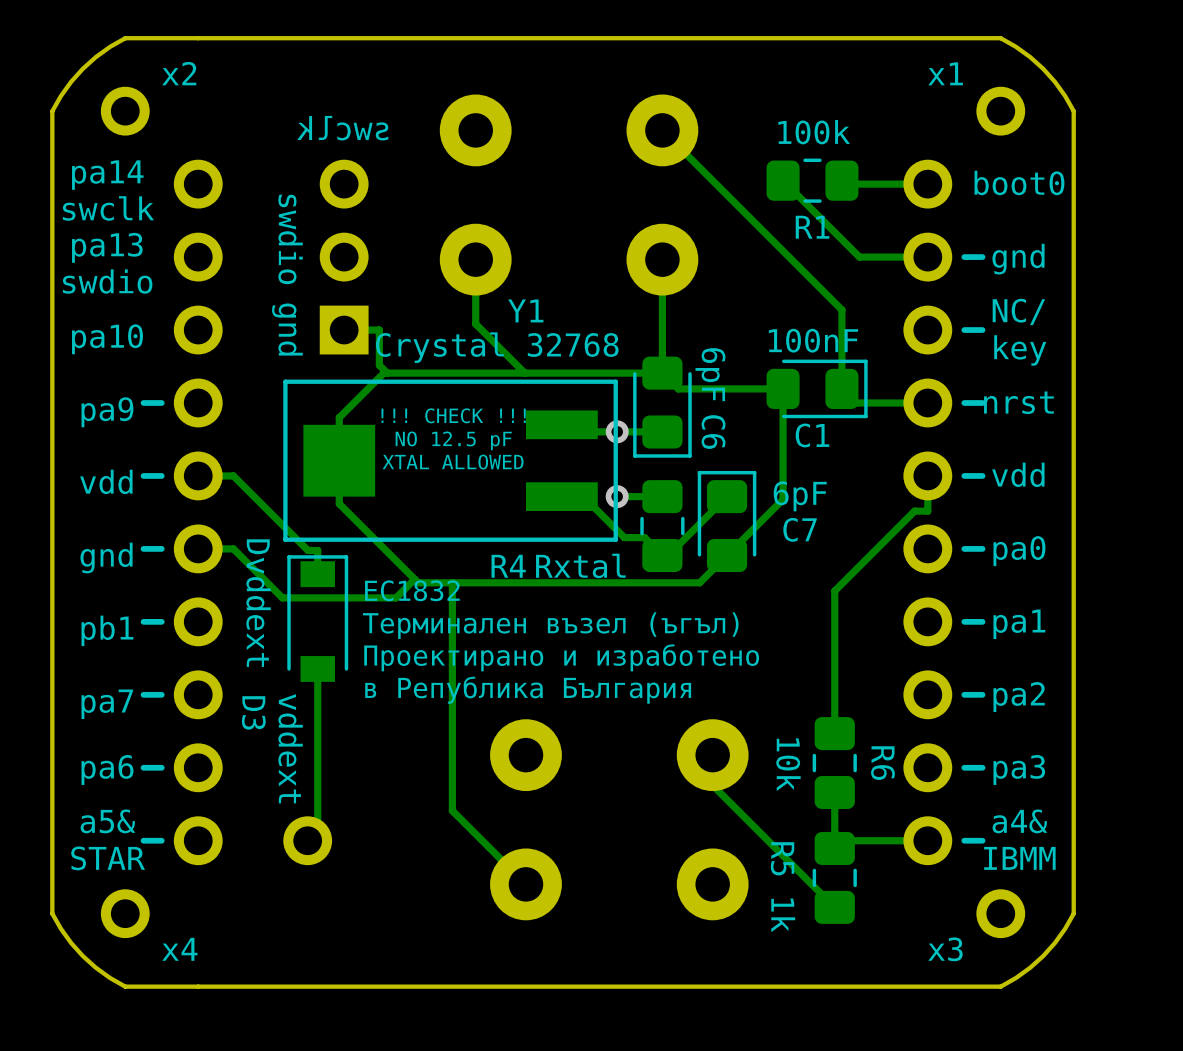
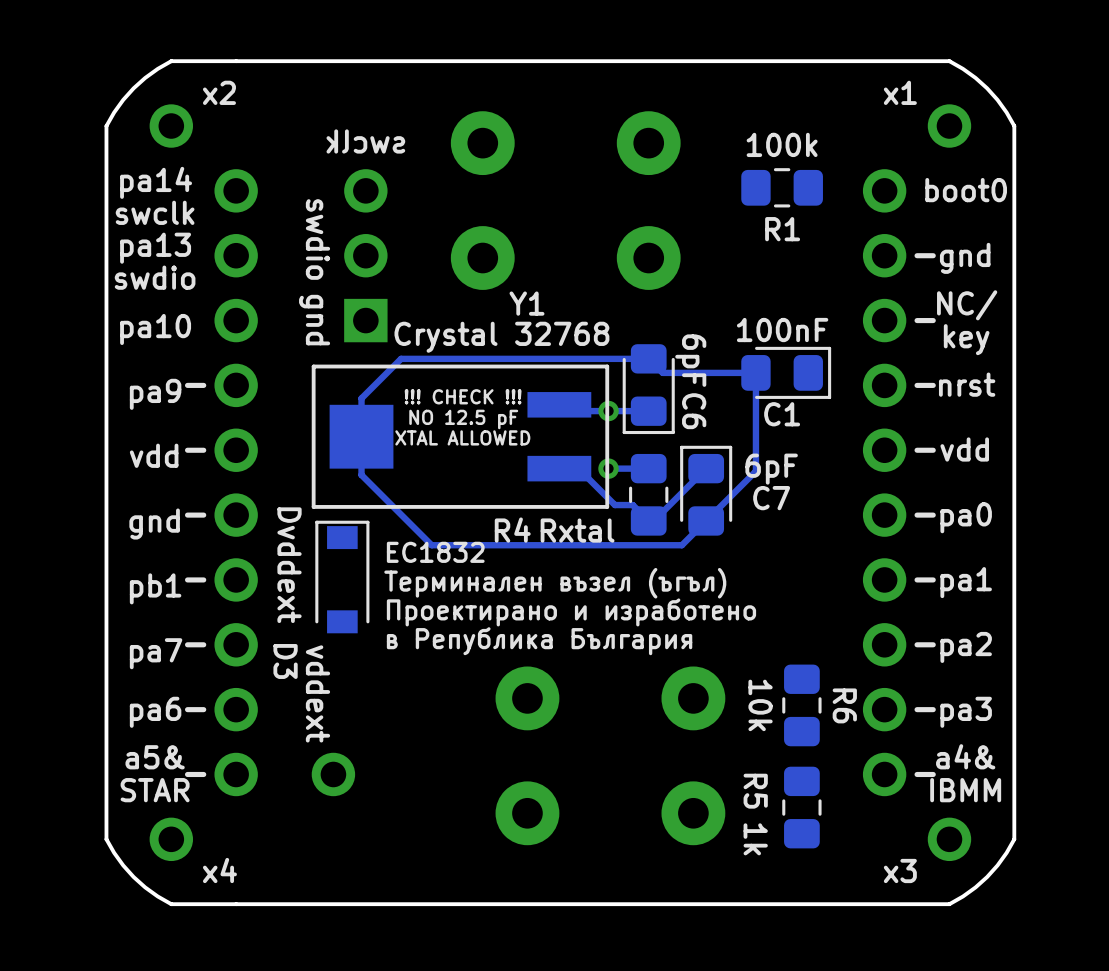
track: (662, 130) (841, 309) (841, 388) (856, 402) (927, 402) -> none
track: (783, 180) (859, 257) (927, 257) -> none
track: (841, 180) (845, 184) (927, 184) -> none
track: (475, 259) (475, 324) (524, 373) -> none
track: (662, 259) (662, 373) -> none
track: (344, 330) (379, 330) (379, 365) (387, 373) -> none
track: (198, 475) (233, 475) (307, 550) (317, 550) (317, 574) -> none
track: (927, 475) (927, 511) (914, 511) (834, 591) (834, 733) -> none
track: (198, 548) (233, 548) (282, 597) (396, 597) (414, 579) -> none
track: (452, 582) (452, 810) (525, 884) -> none
track: (317, 668) (317, 830) (307, 840) -> none
track: (712, 755) (712, 785) (834, 907) -> none
track: (834, 792) (834, 832) (842, 840) -> none
track: (927, 840) (842, 840) -> none

